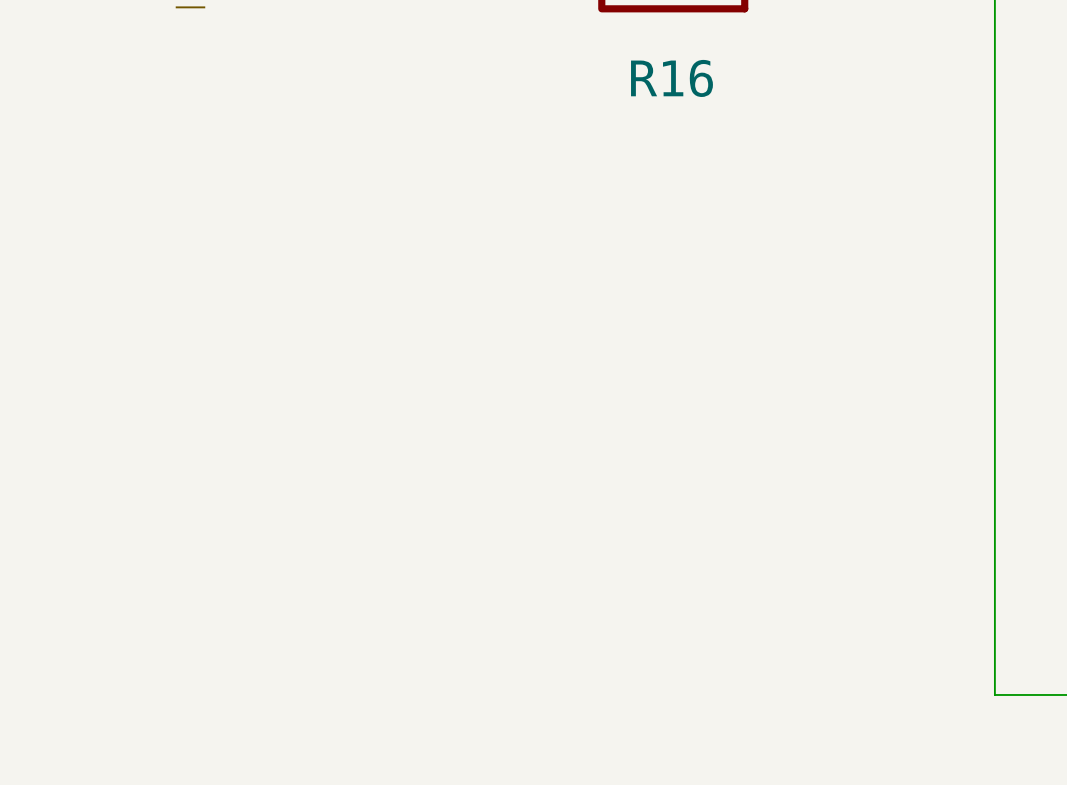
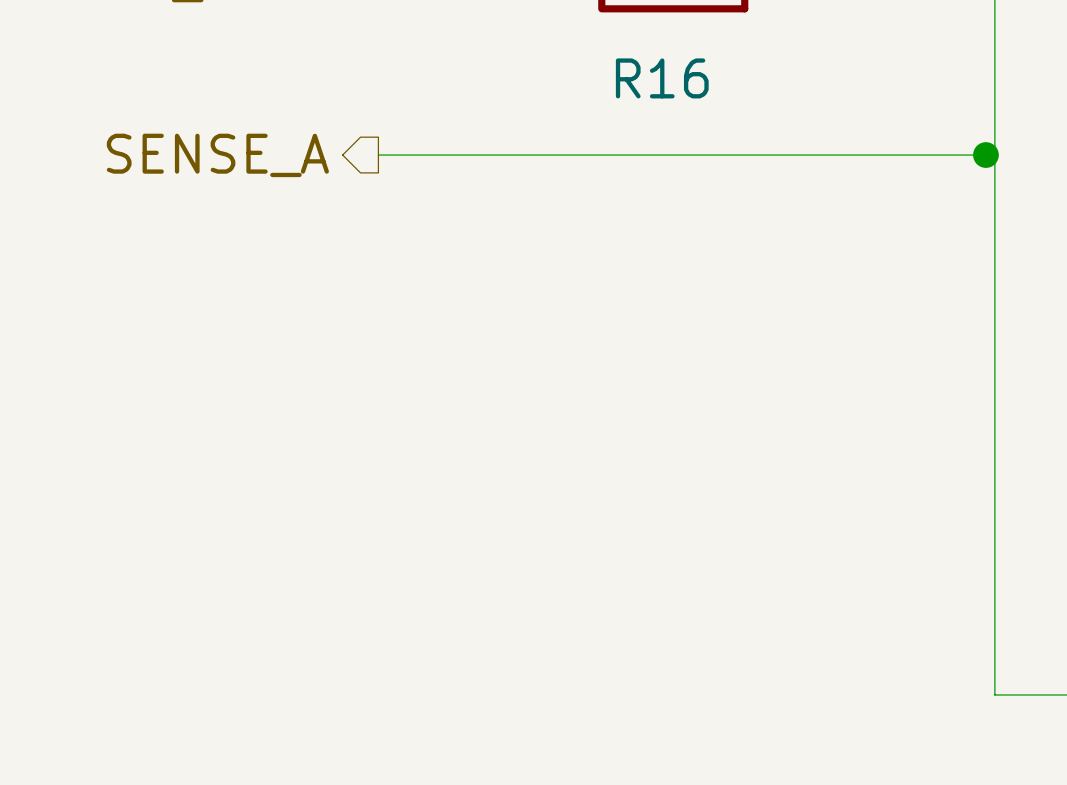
wire: none -> (378, 155) (985, 155)
junction: none -> (985, 155)
hierarchical label: none -> SENSE_A (217, 155)

